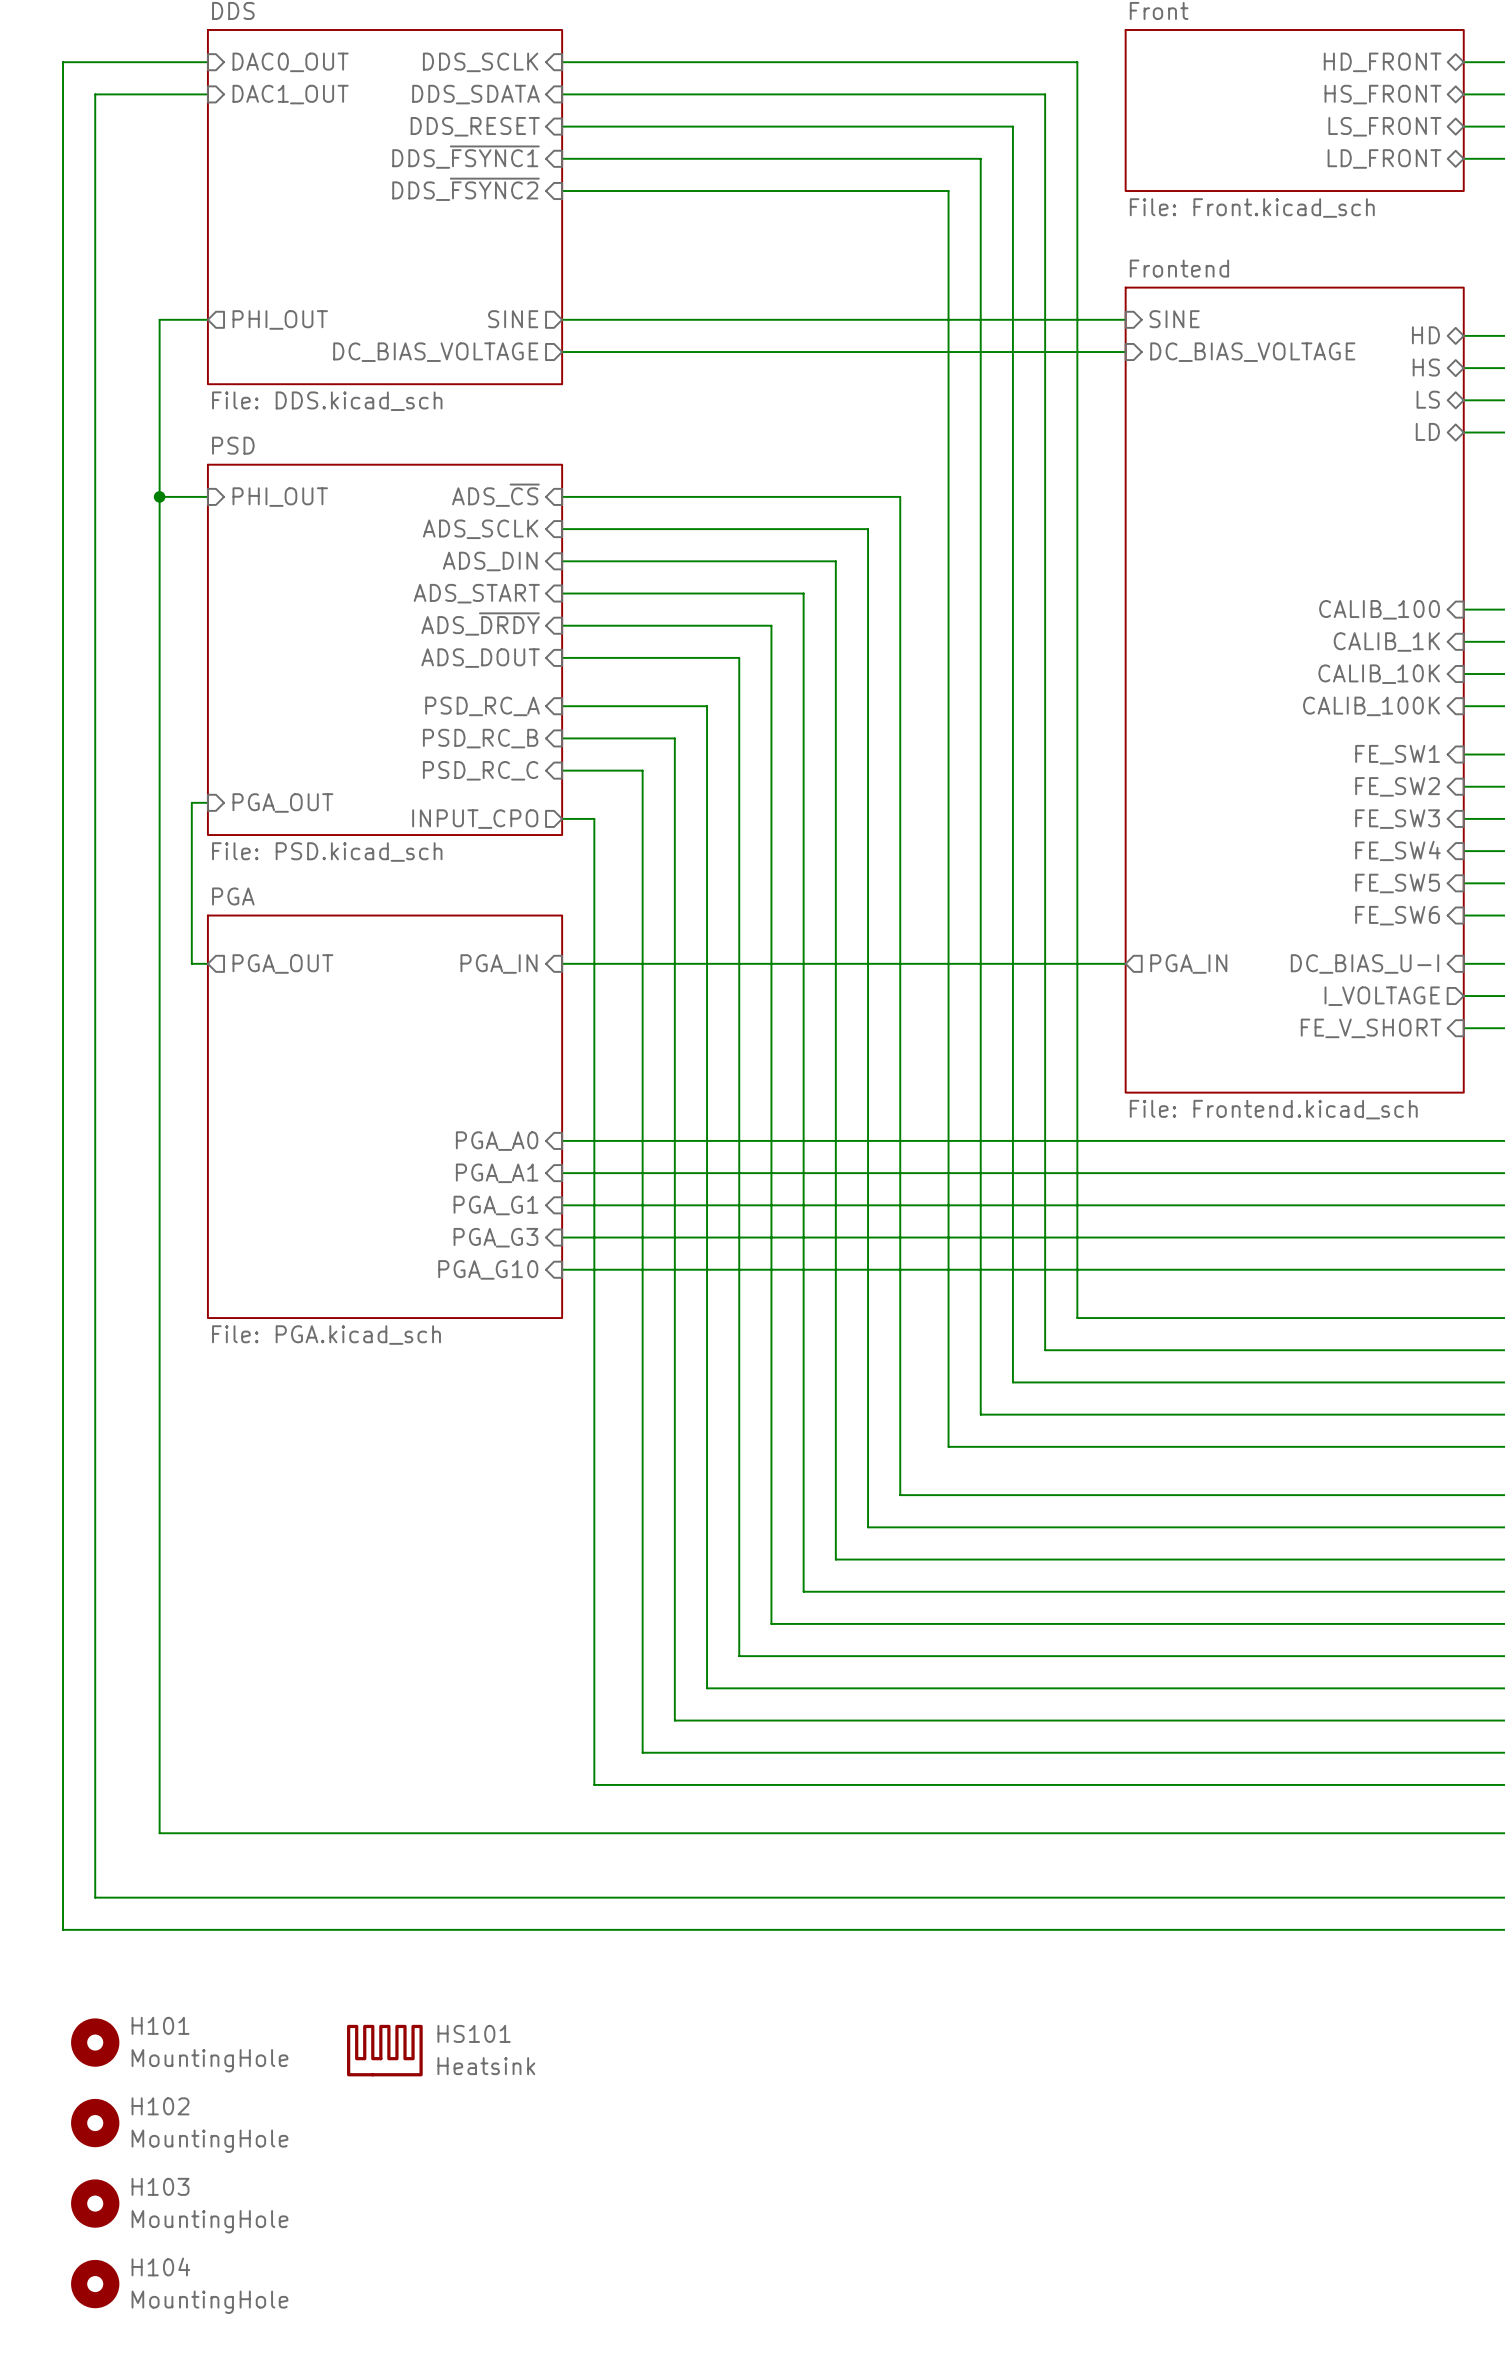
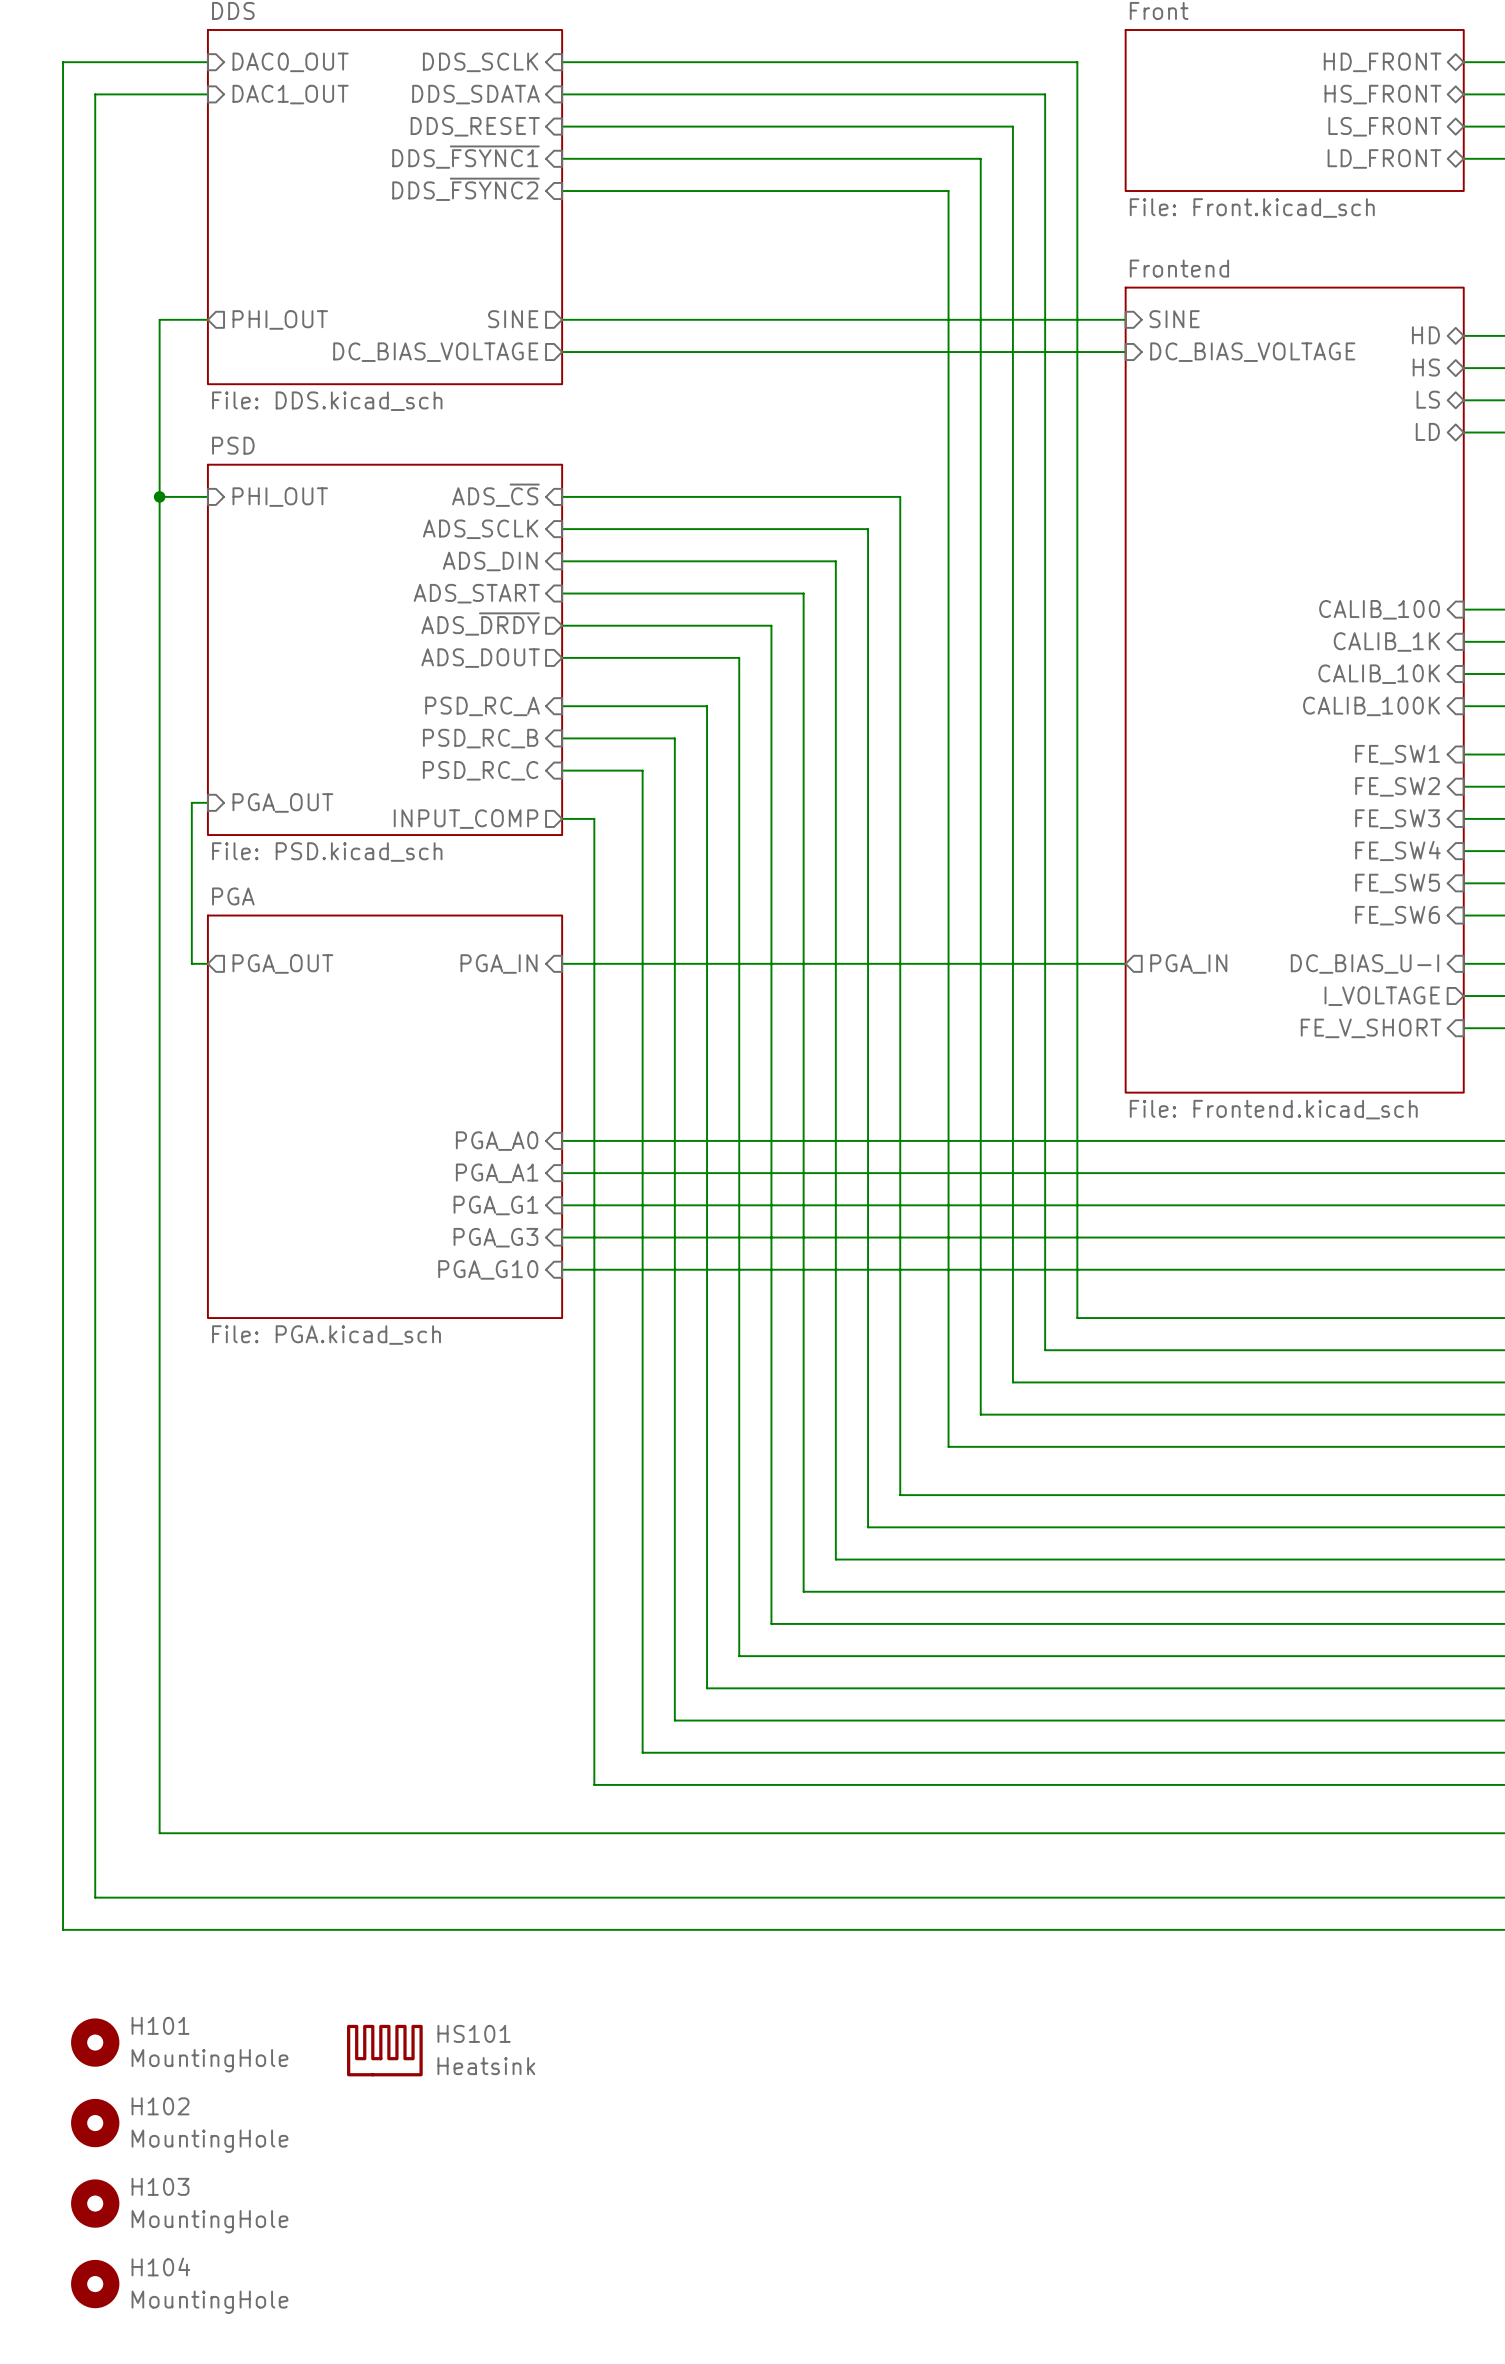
sheet pin shape: input (480, 624) -> output (480, 624)
sheet pin shape: input (480, 658) -> output (480, 658)
sheet pin: INPUT_CPO (475, 819) -> INPUT_COMP (466, 819)

